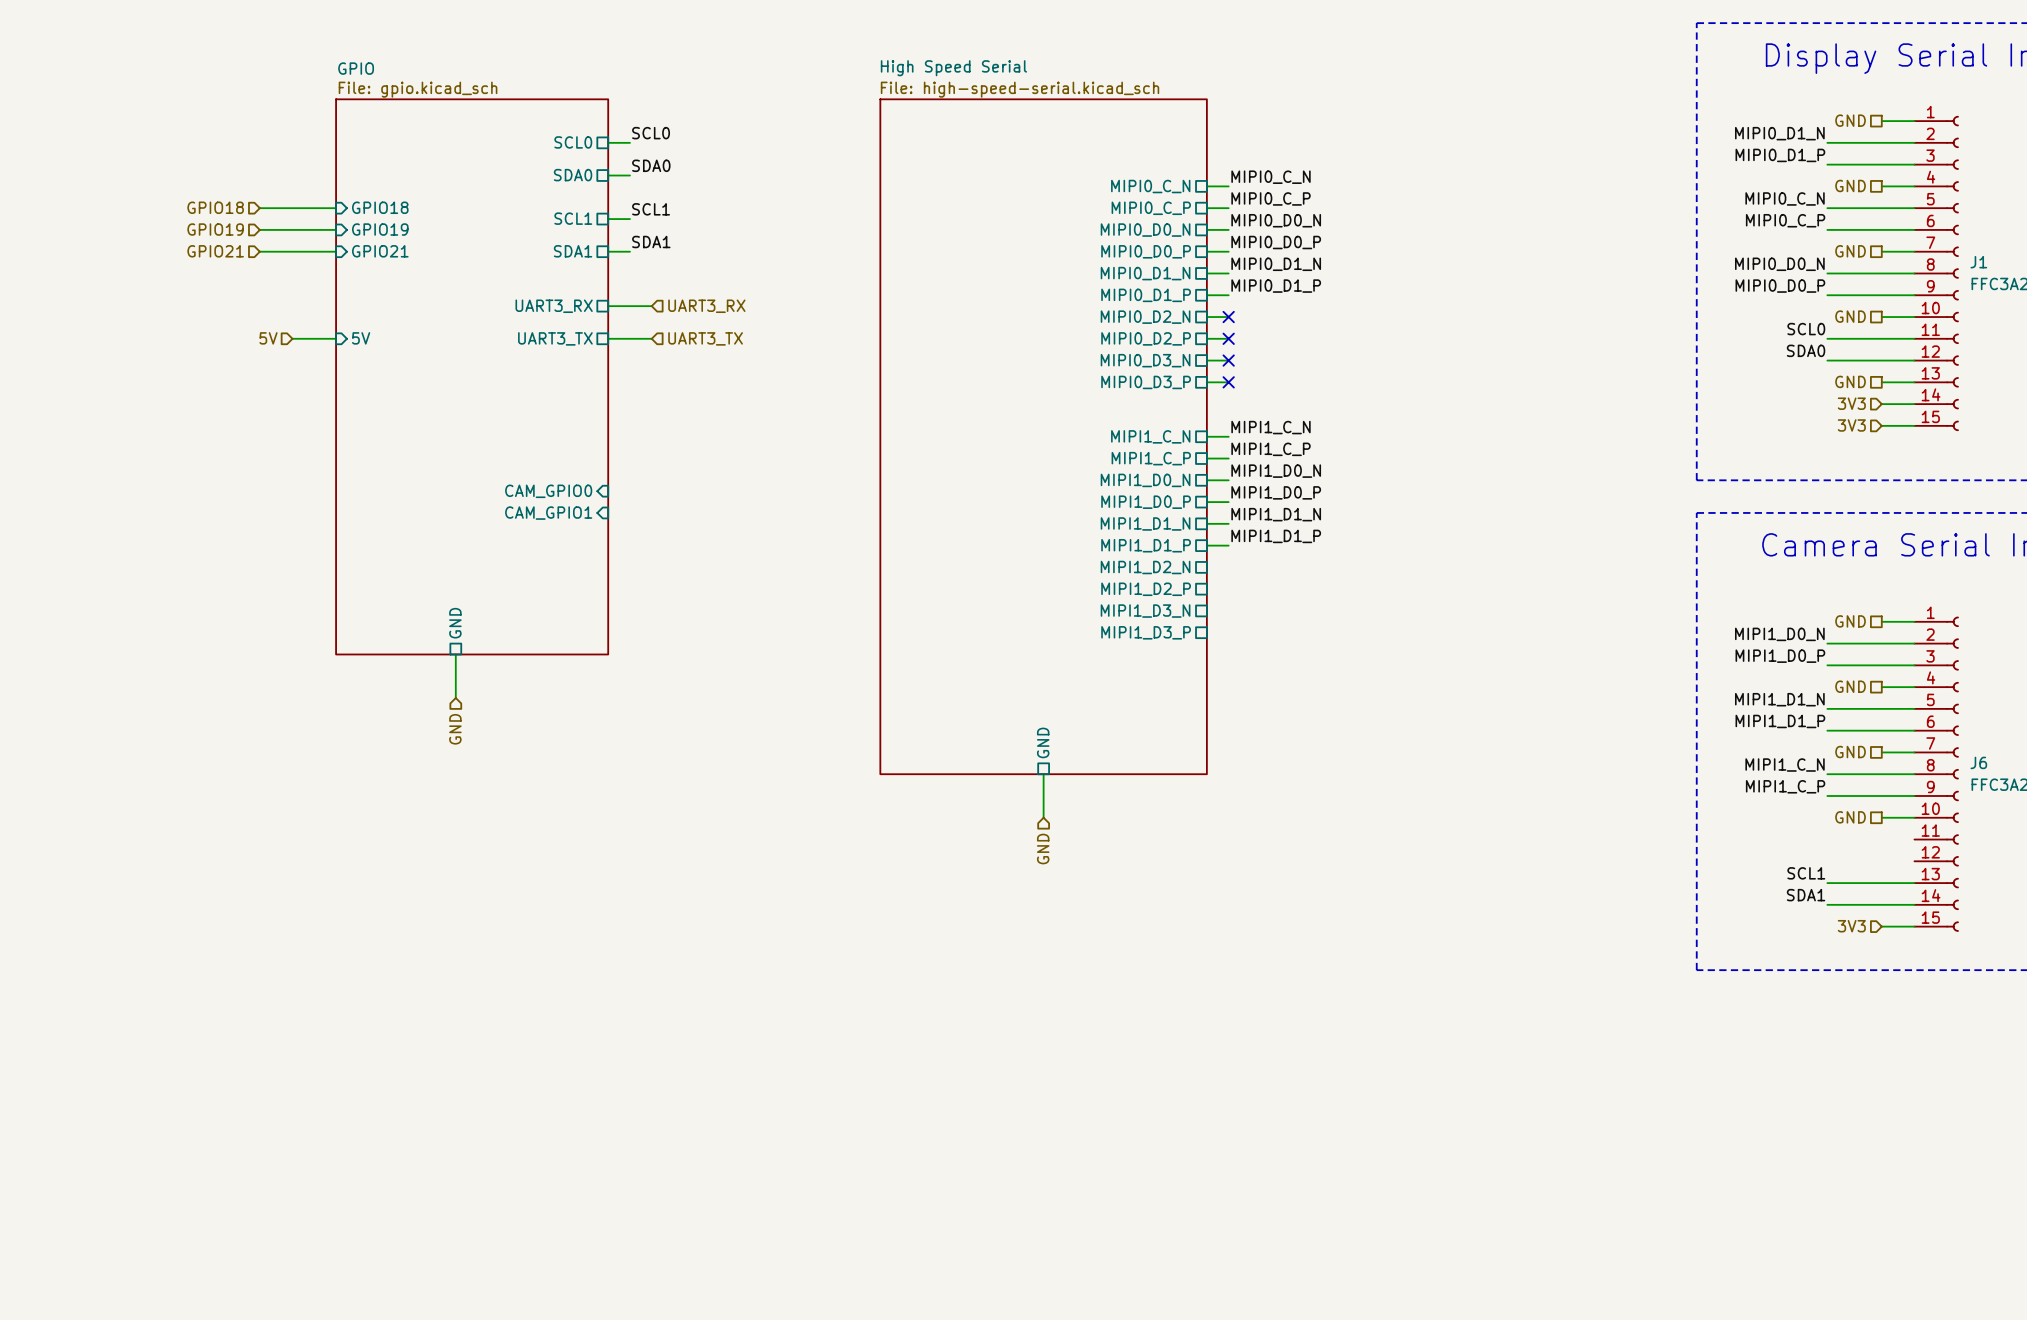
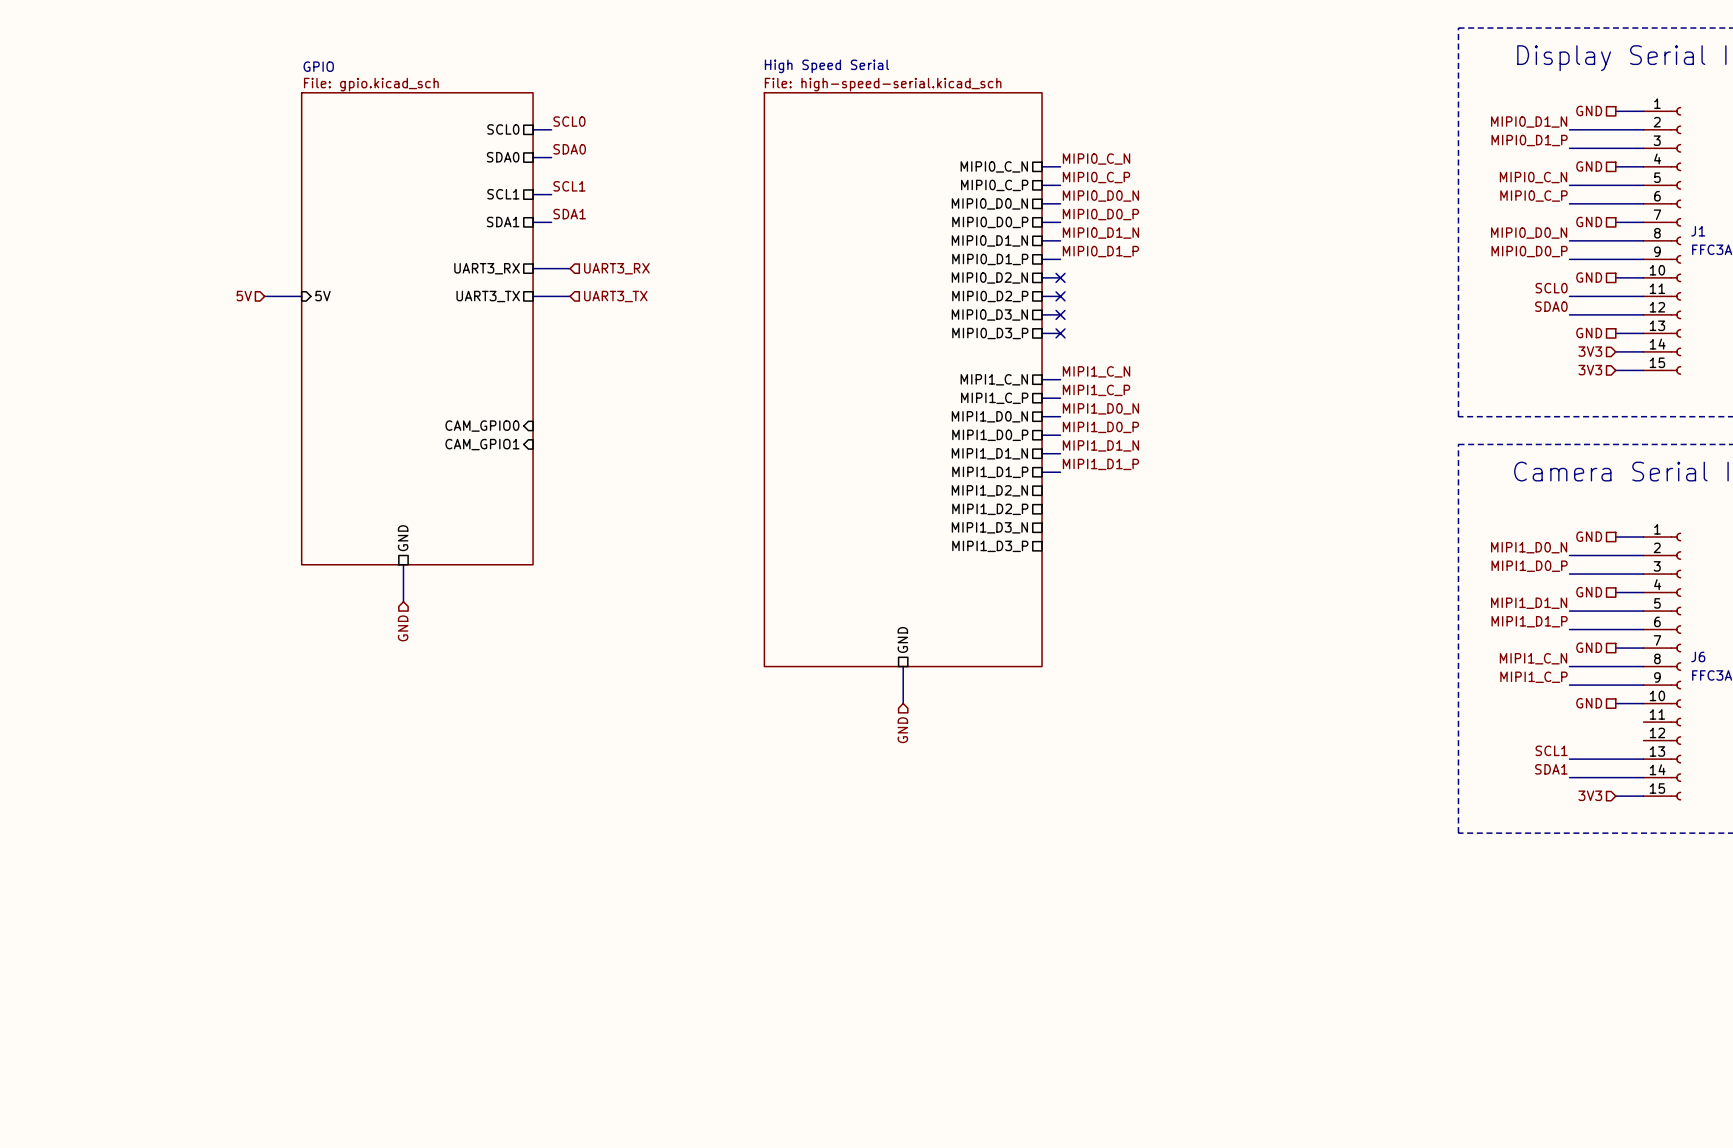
hierarchical label: GPIO18 (215, 207) -> none
sheet pin: GPIO18 (380, 207) -> none
wire: (259, 208) (336, 208) -> none
hierarchical label: GPIO19 (215, 229) -> none
wire: (259, 229) (336, 229) -> none
sheet pin: GPIO19 (380, 229) -> none
hierarchical label: GPIO21 (215, 251) -> none
wire: (259, 251) (336, 251) -> none
sheet pin: GPIO21 (380, 251) -> none

